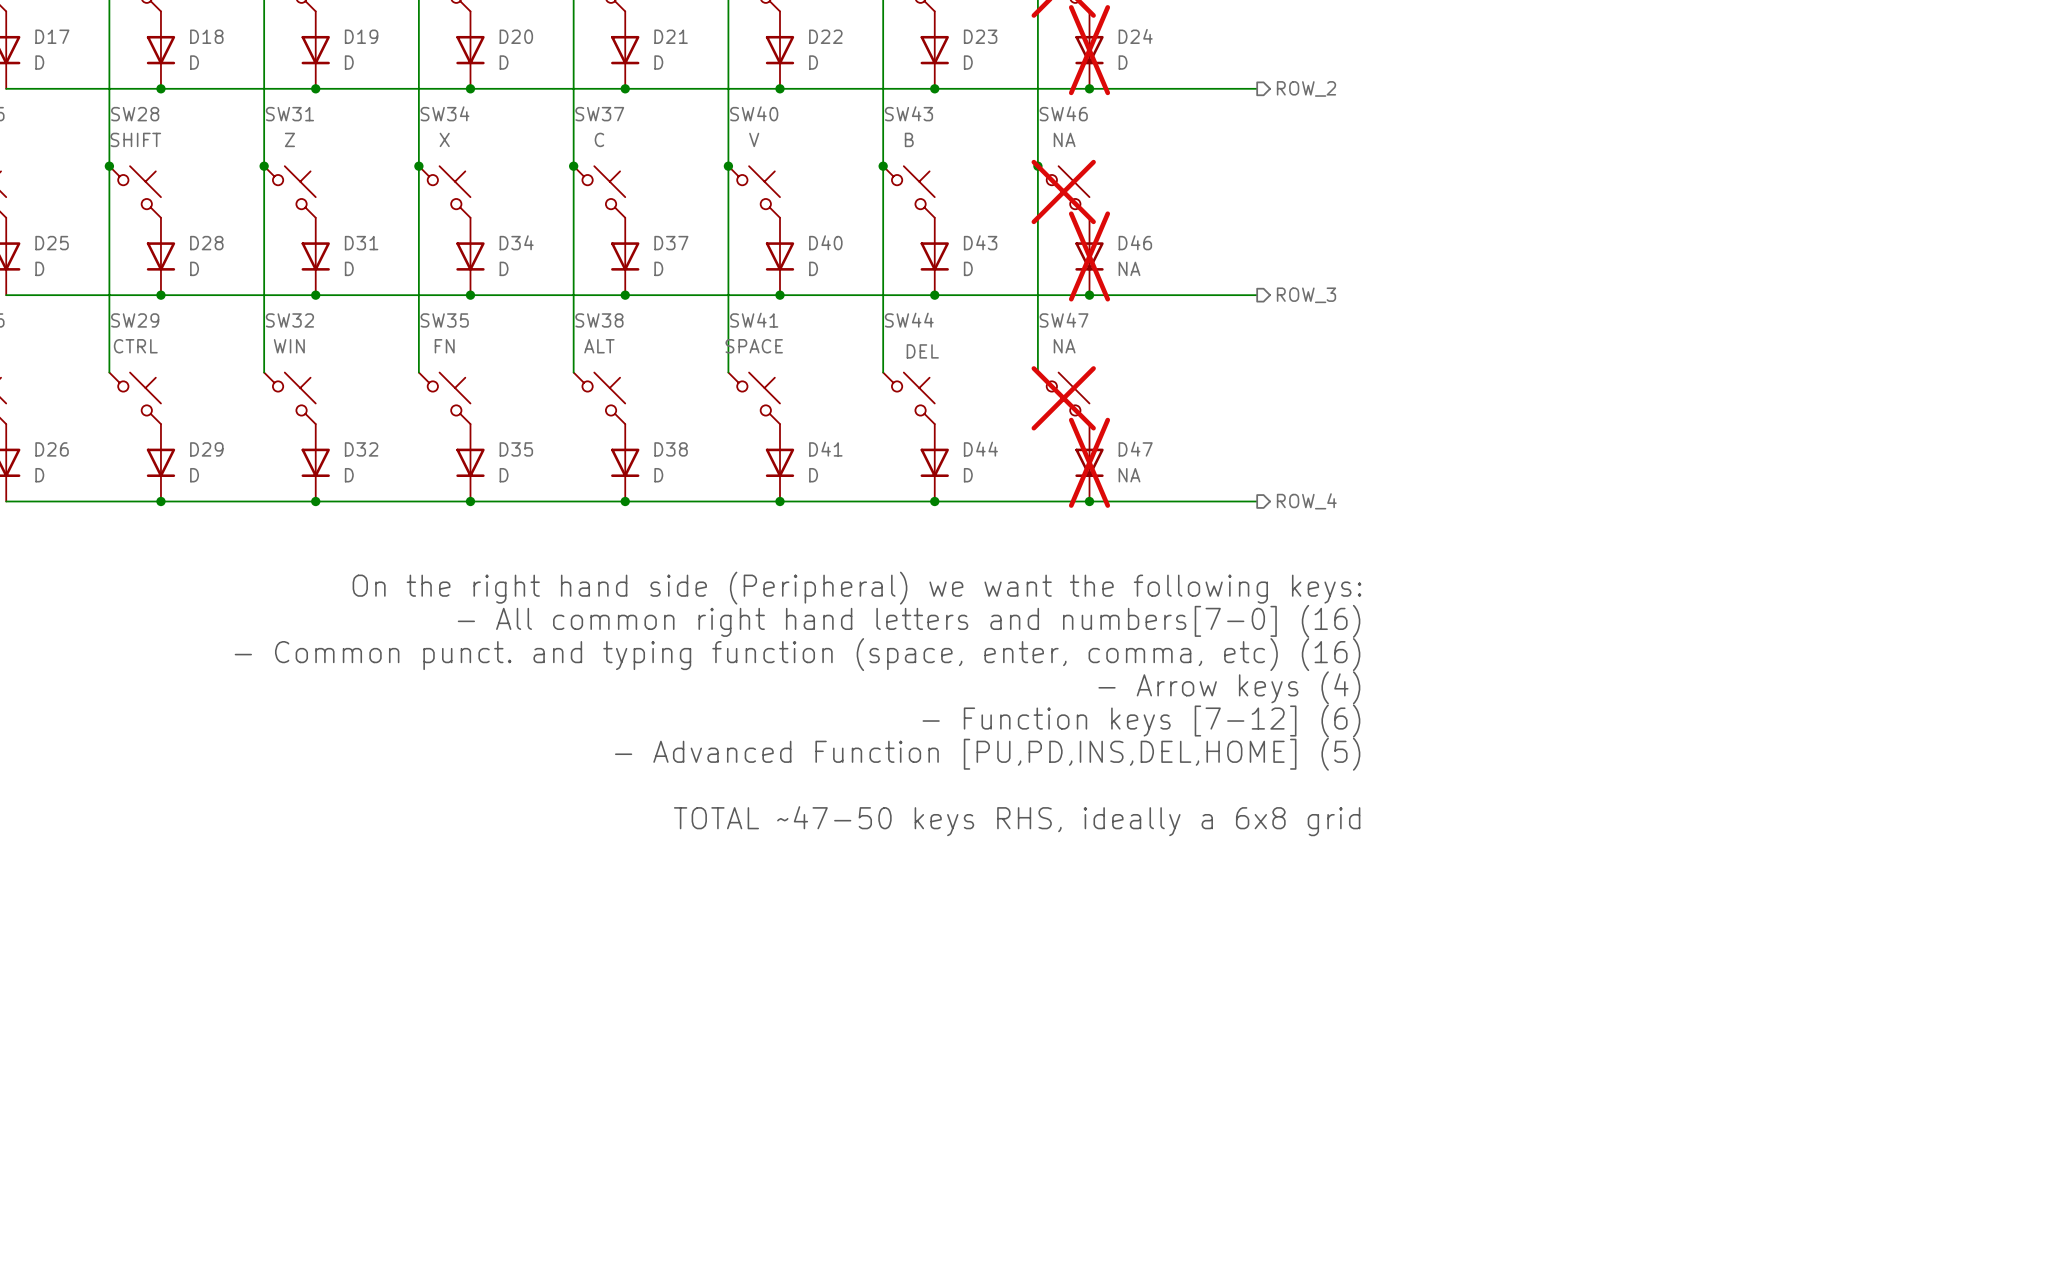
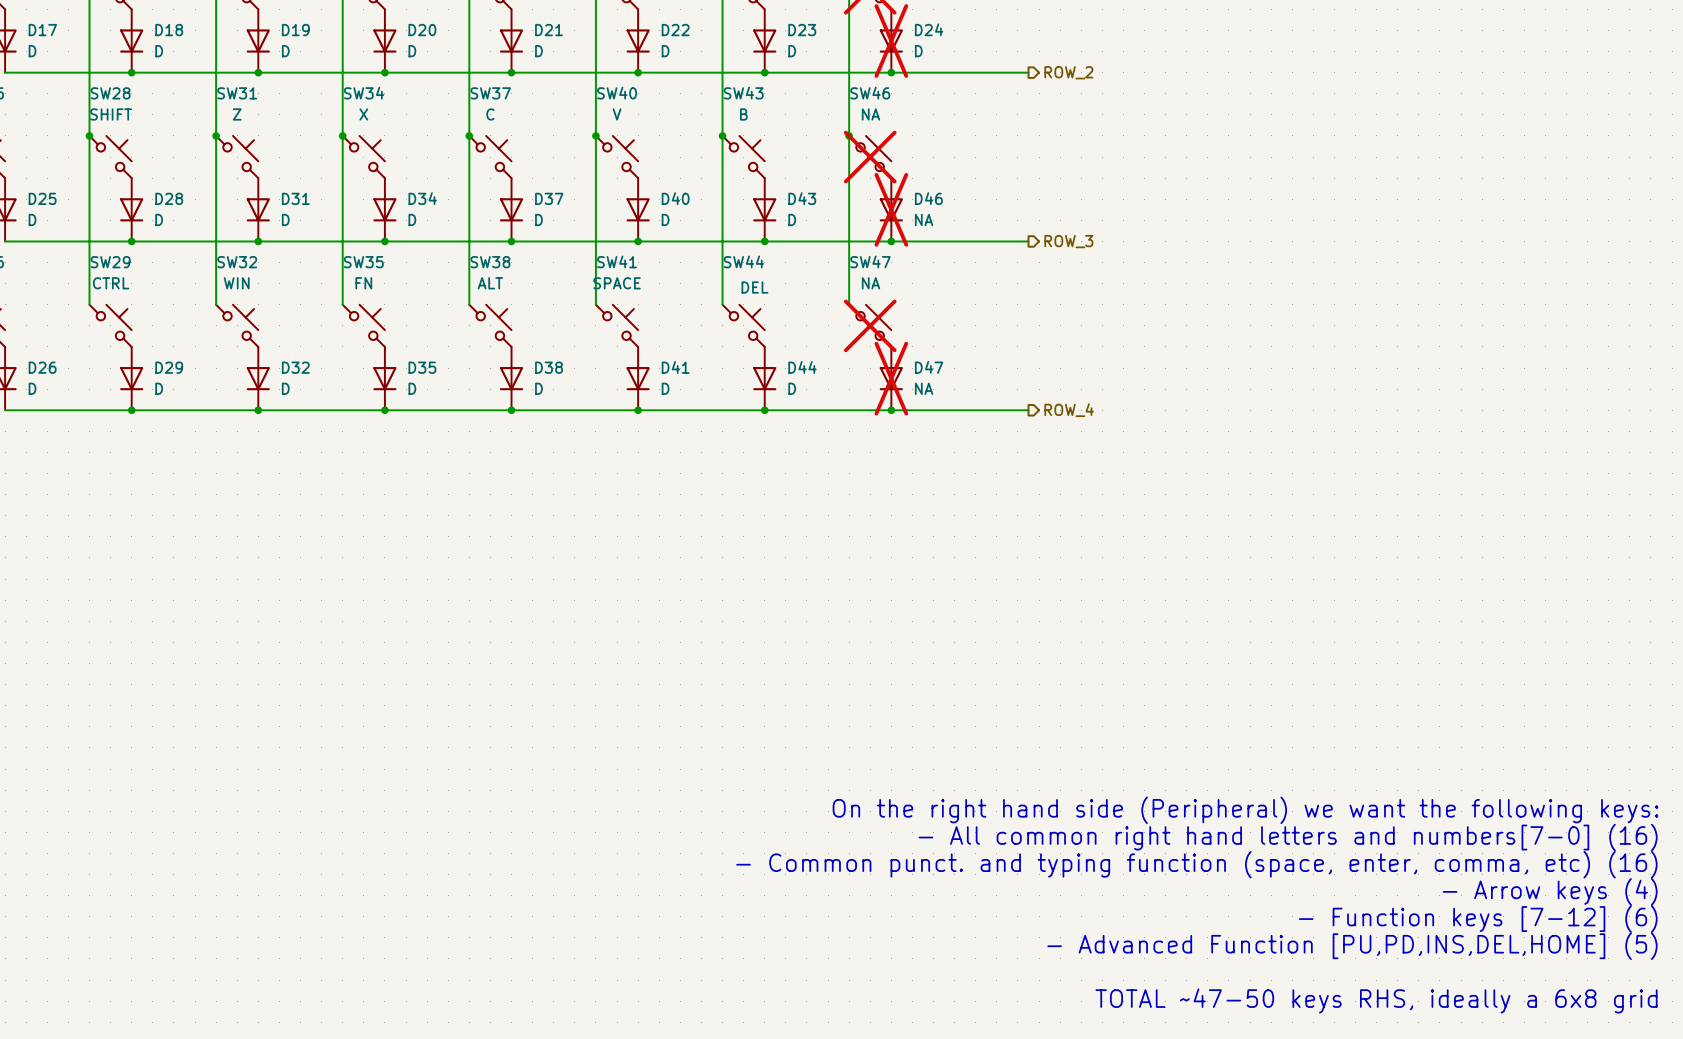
text: On the right hand side (Peripheral) we want the following keys: (856, 588) -> none
text: - All common right hand letters and numbers[7-0] (16) (909, 621) -> none
text: - Common punct. and typing function (space, enter, comma, etc) (16) (797, 654) -> none
text: - Arrow keys (4) (1229, 687) -> none
text: - Function keys [7-12] (6) (1141, 721) -> none
text: - Advanced Function [PU,PD,INS,DEL,HOME] (5) (987, 754) -> none
text: TOTAL ~47-50 keys RHS, ideally a 6x8 grid (1017, 821) -> none
text: none -> On the right hand side (Peripheral) we want the following keys: (1245, 810)
text: none -> - All common right hand letters and numbers[7-0] (16) (1288, 837)
text: none -> - Common punct. and typing function (space, enter, comma, etc) (16) (1196, 864)
text: none -> - Arrow keys (4) (1550, 891)
text: none -> - Function keys [7-12] (6) (1478, 919)
text: none -> - Advanced Function [PU,PD,INS,DEL,HOME] (5) (1352, 946)
text: none -> TOTAL ~47-50 keys RHS, ideally a 6x8 grid (1376, 1000)

